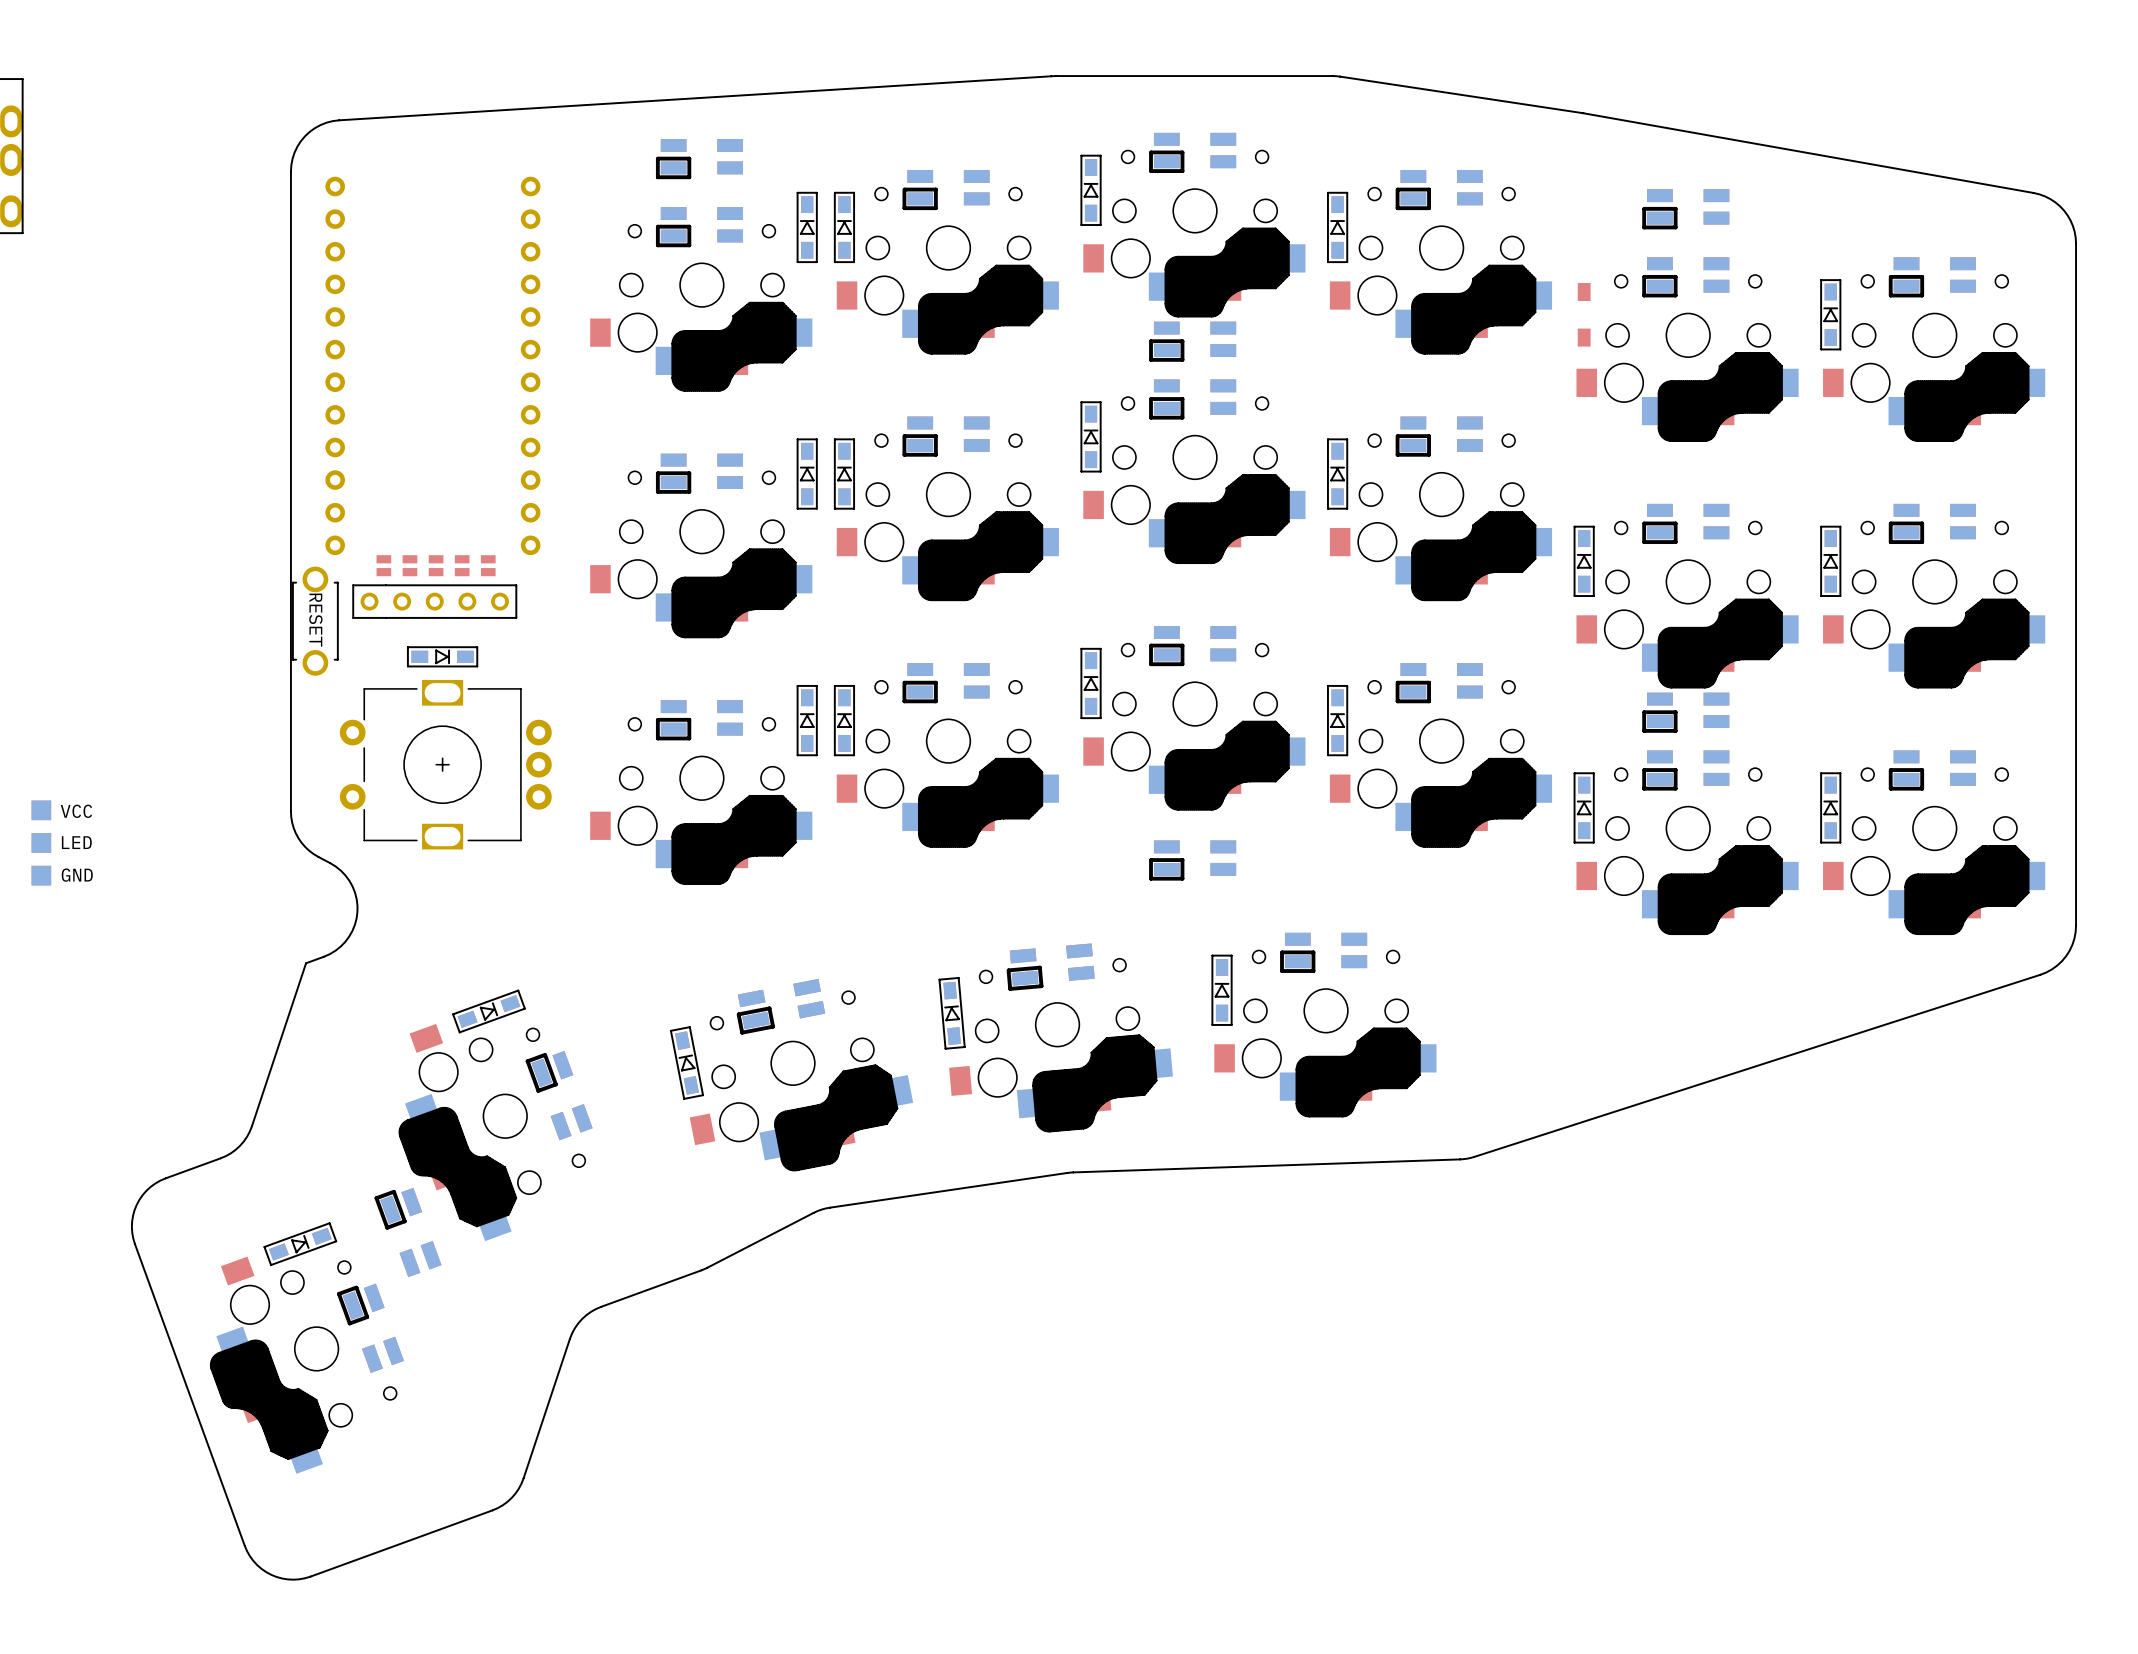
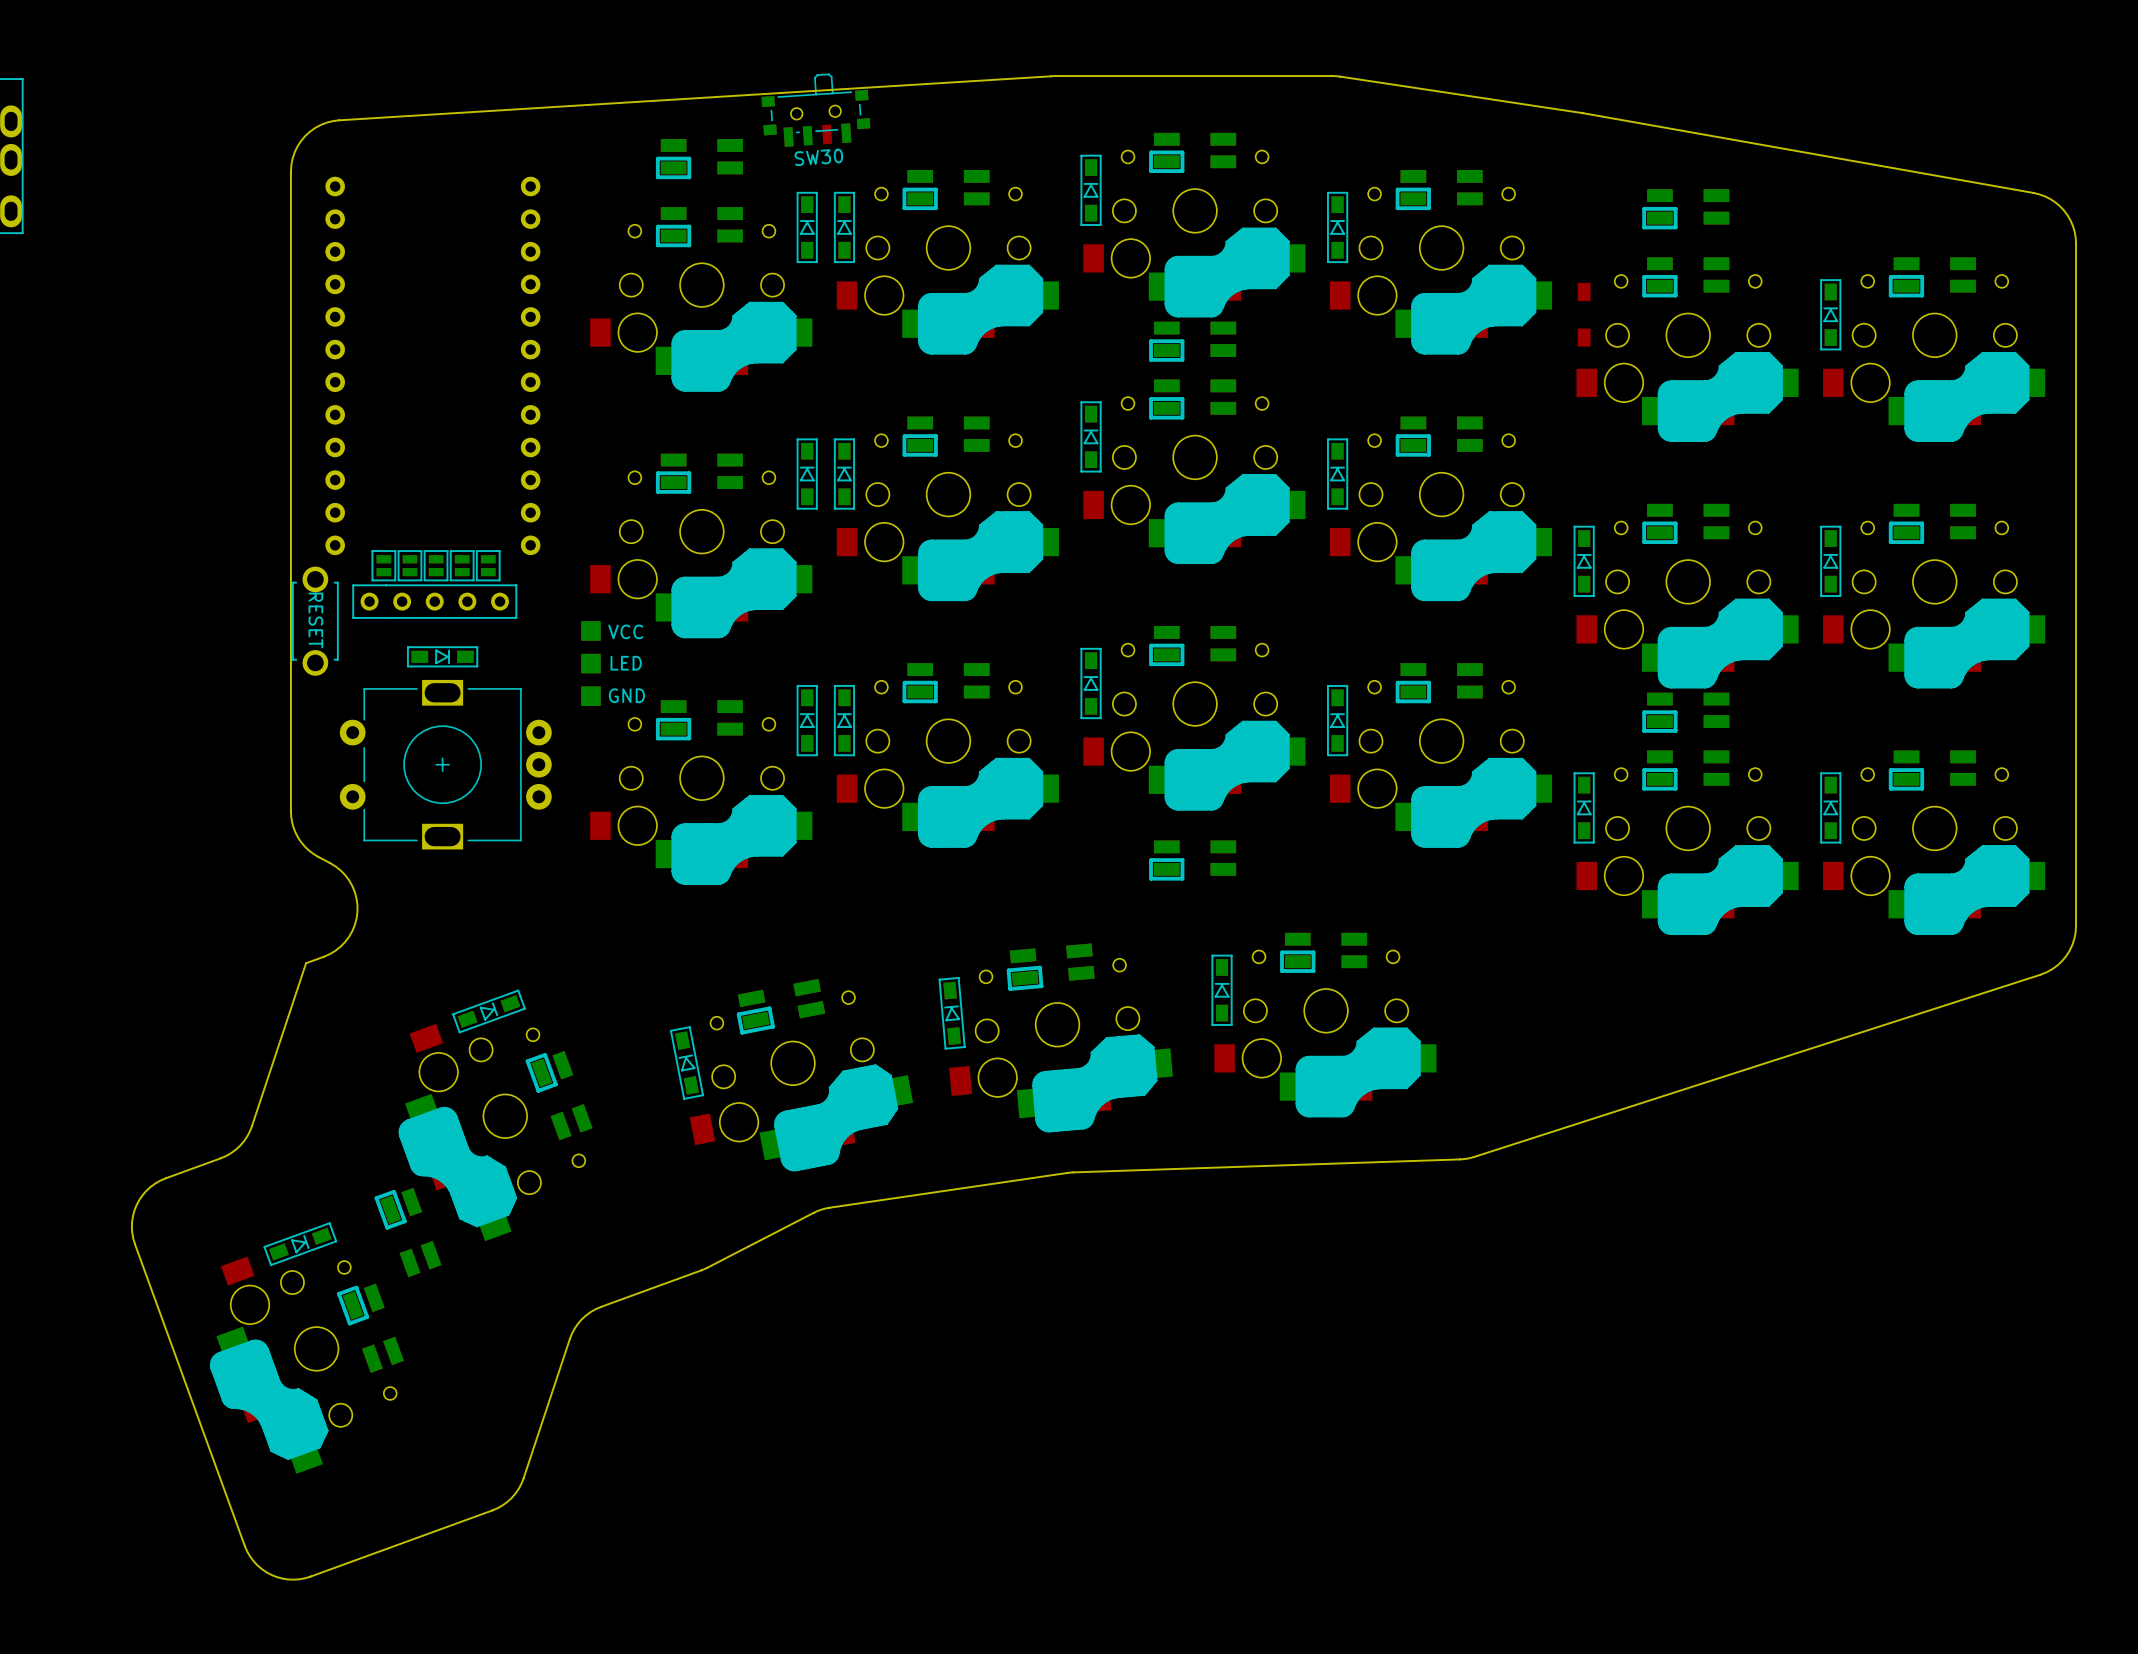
SW30: none -> (815, 110)
part: none -> (383, 565)
part: none -> (409, 565)
part: none -> (436, 565)
part: none -> (462, 565)
part: none -> (488, 565)
part: none -> (591, 663)
part: (41, 842) -> none

